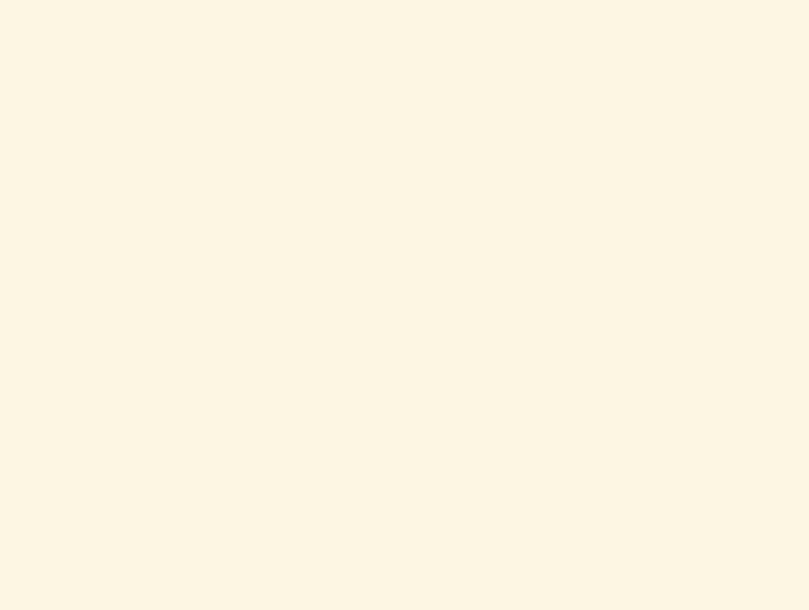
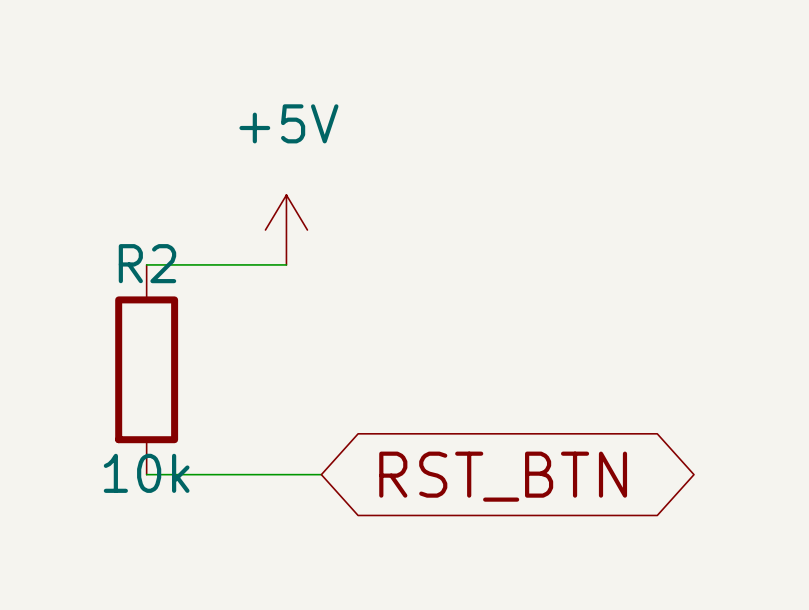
power symbol: none -> +5V (286, 230)
wire: none -> (146, 264) (286, 264)
R2: none -> 10k (146, 369)
wire: none -> (146, 474) (321, 474)
global label: none -> RST_BTN (503, 476)

